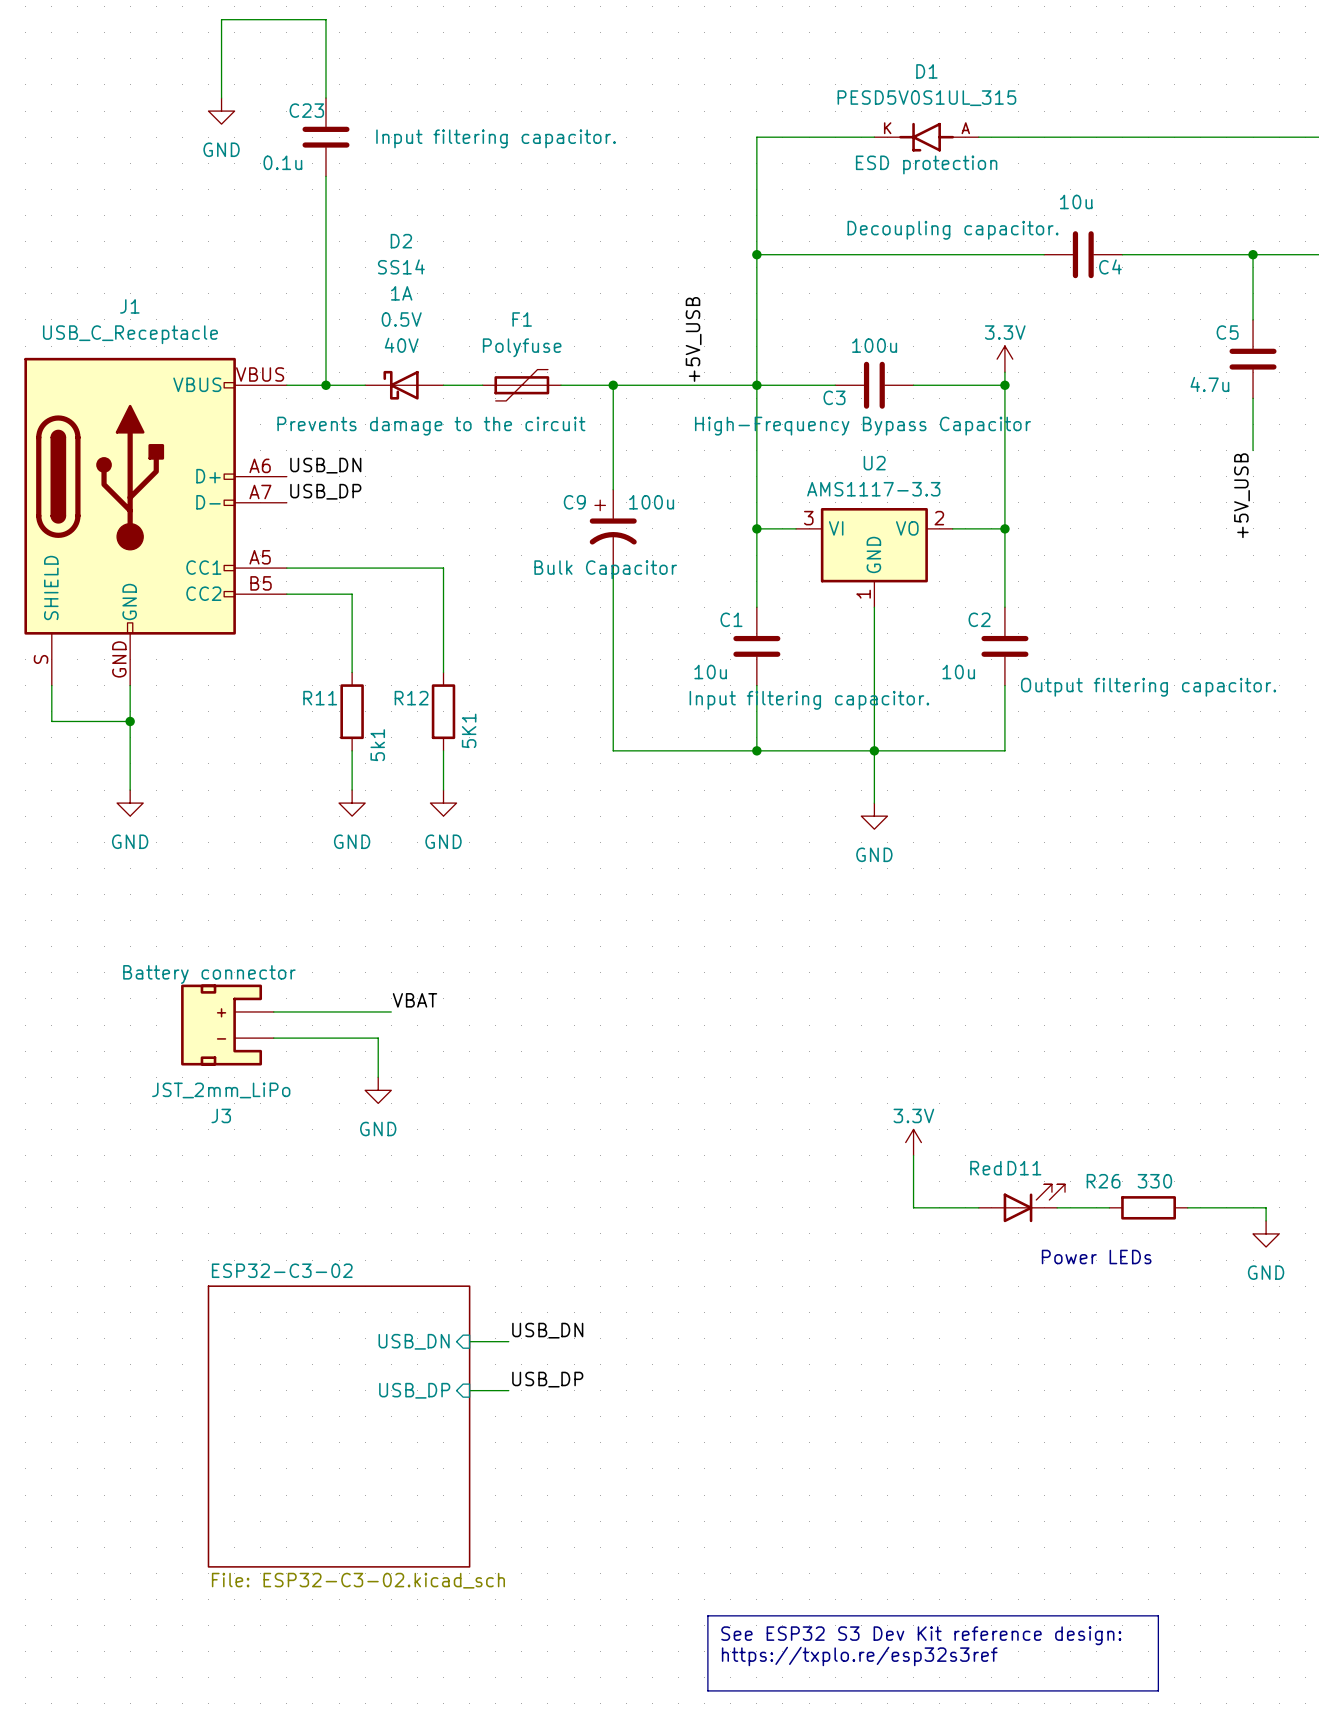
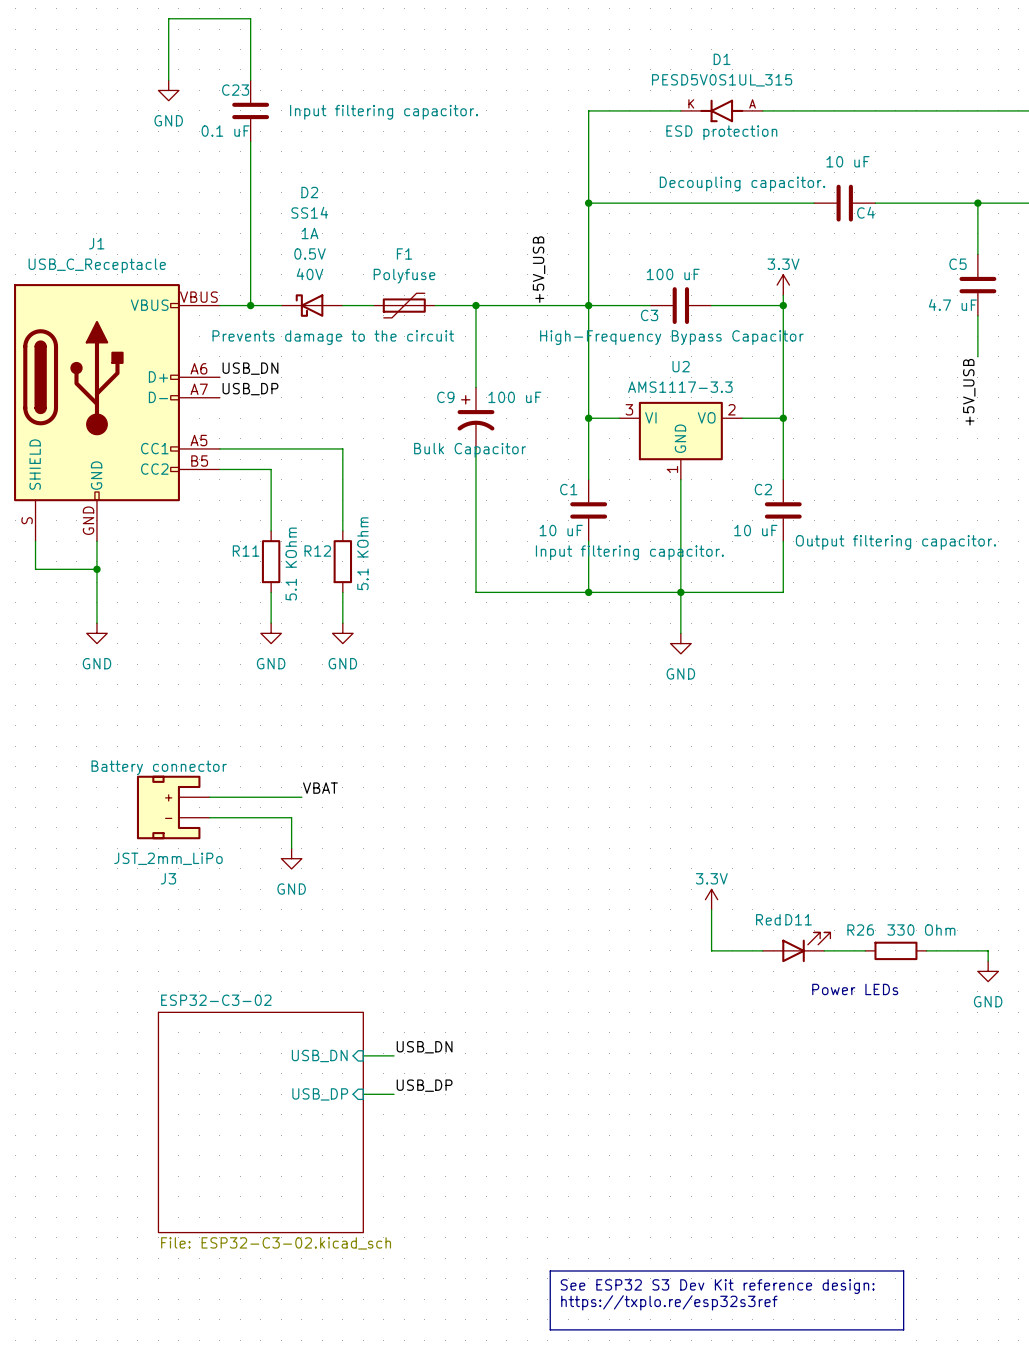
C23 value: 0.1u (282, 162) -> 0.1 uF (225, 131)
C4 value: 10u (1076, 201) -> 10 uF (847, 161)
C3 value: 100u (874, 345) -> 100 uF (673, 274)
C5 value: 4.7u (1209, 384) -> 4.7 uF (952, 304)
C9 value: 100u (651, 502) -> 100 uF (514, 397)
C1 value: 10u (710, 672) -> 10 uF (561, 530)
C2 value: 10u (958, 672) -> 10 uF (755, 530)
R12 value: 5K1 (469, 730) -> 5.1 KOhm (362, 553)
R11 value: 5k1 (377, 745) -> 5.1 KOhm (291, 564)
R26 value: 330 (1154, 1181) -> 330 Ohm (921, 930)

